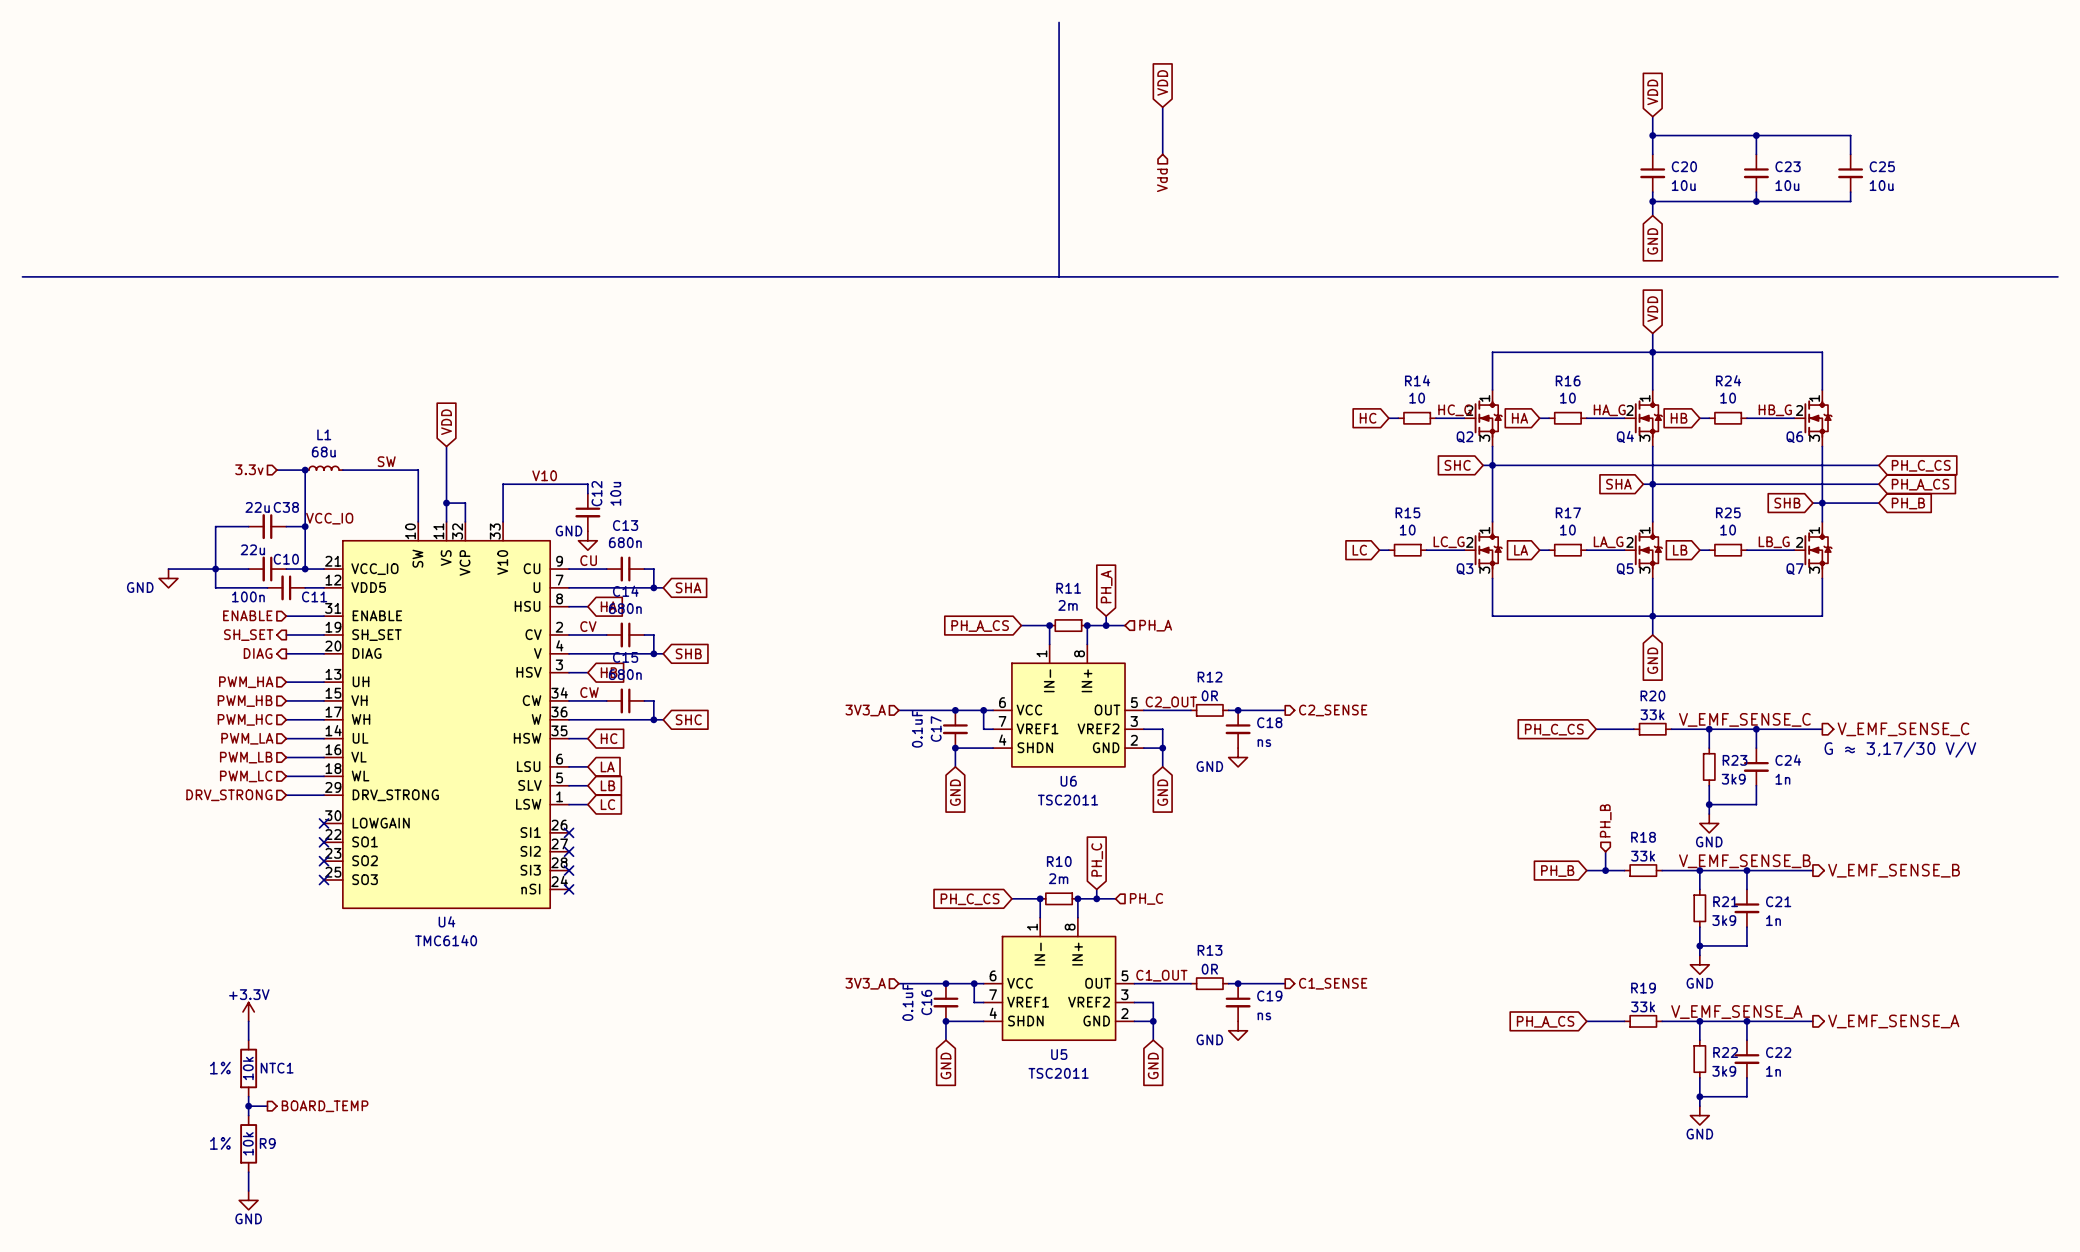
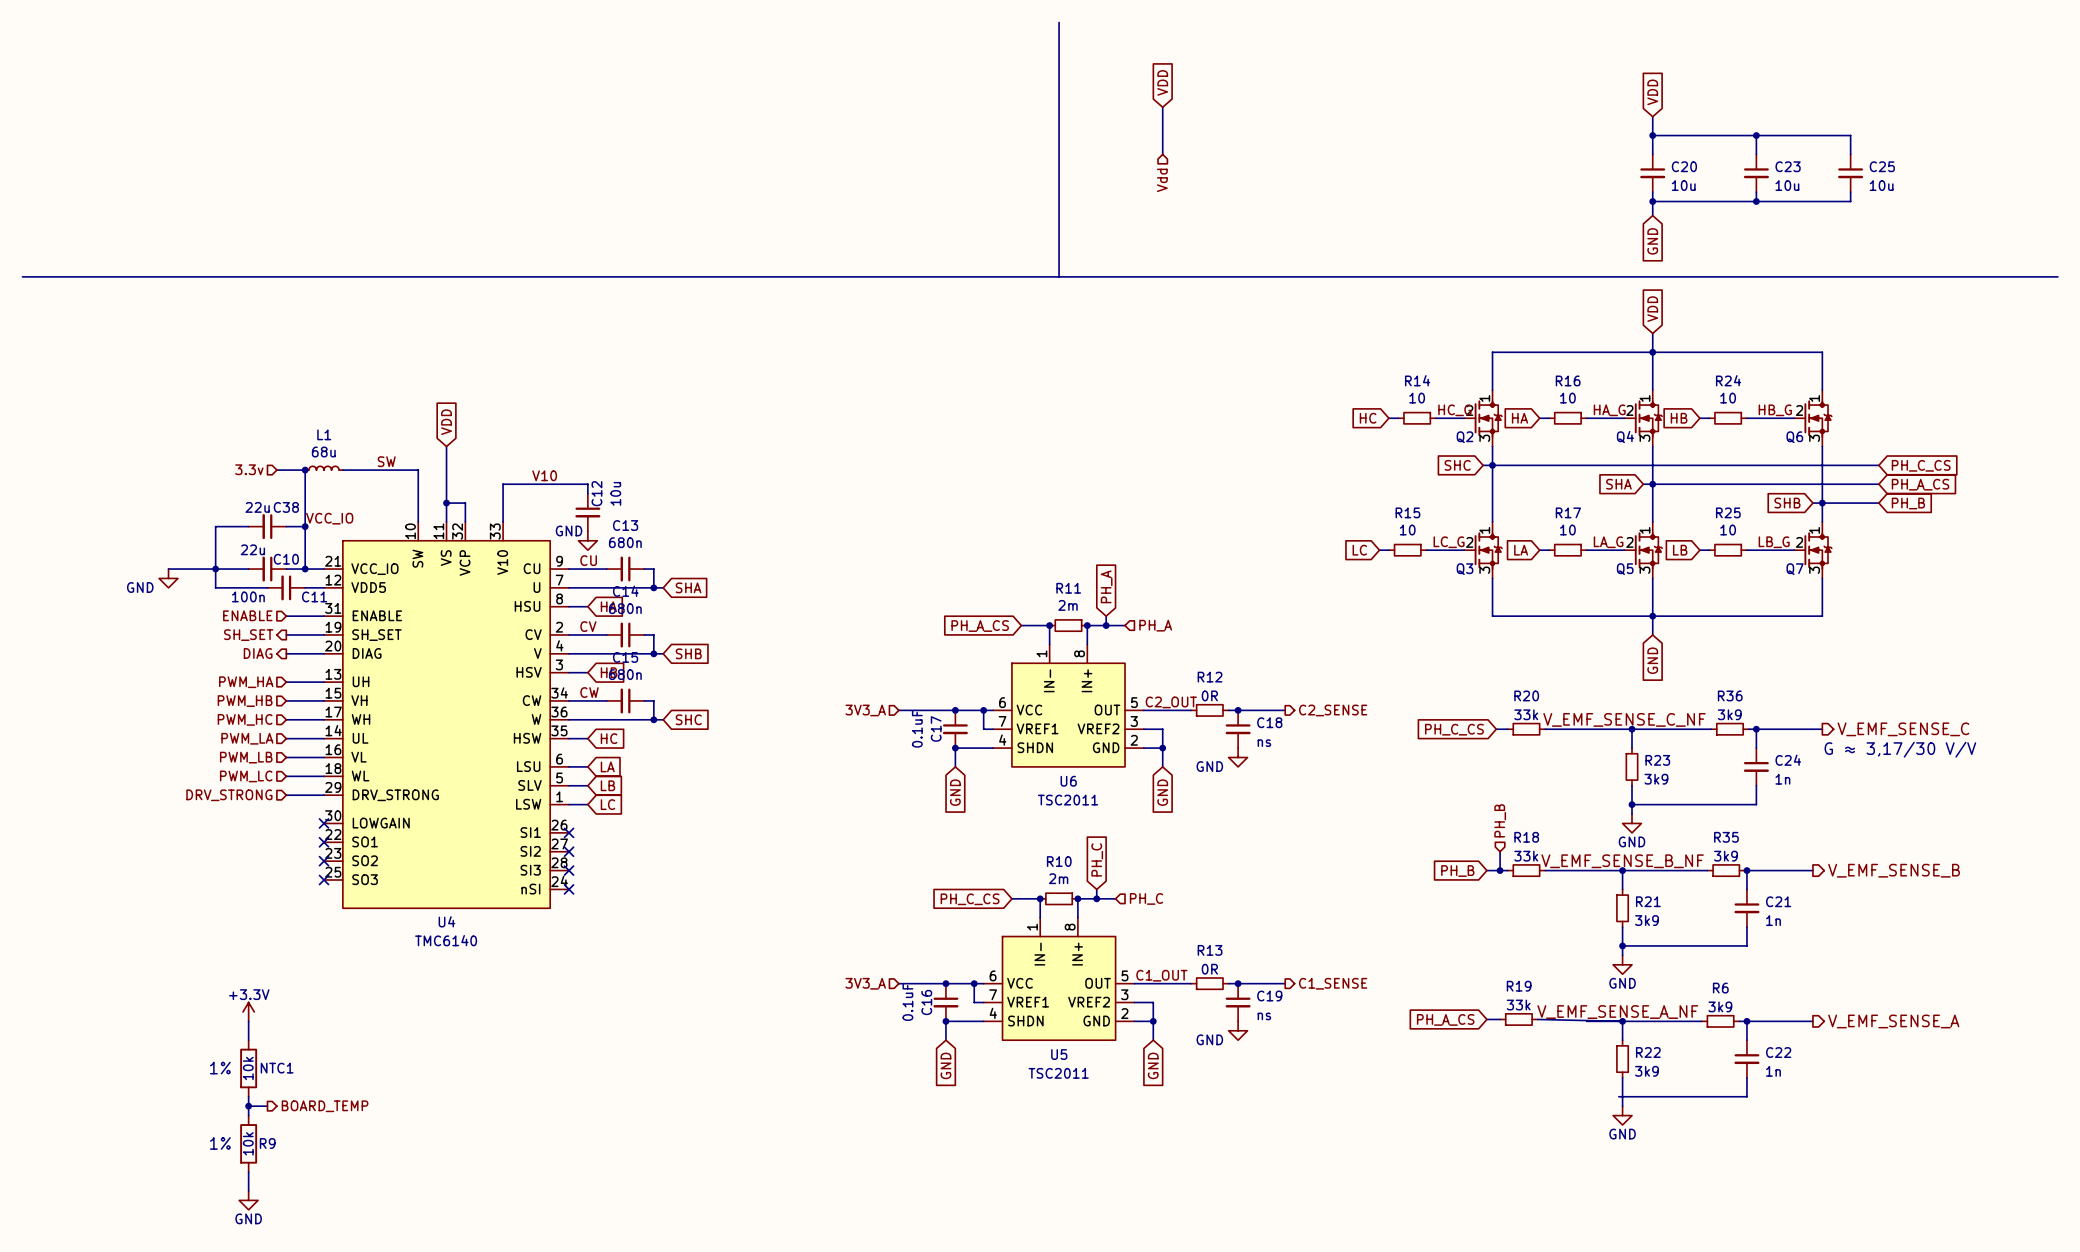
label: V_EMF_SENSE_C (1744, 719) -> V_EMF_SENSE_C_NF (1624, 719)
wire: none -> (1496, 729) (1507, 729)
wire: none -> (1545, 729) (1596, 729)
global label position: PH_C_CS (1554, 729) -> PH_C_CS (1454, 729)
junction: none -> (1632, 729)
R20 position: (1652, 729) -> (1526, 729)
wire: (1709, 729) (1709, 748) -> (1632, 729) (1632, 748)
junction: (1709, 729) -> none
wire: (1711, 729) (1748, 729) -> (1633, 729) (1671, 729)
R36: none -> 3k9 (1730, 729)
R23 position: (1709, 766) -> (1632, 766)
wire: (1709, 785) (1709, 814) -> (1632, 785) (1632, 814)
wire: none -> (1632, 804) (1709, 804)
junction: none -> (1632, 804)
junction: (1709, 804) -> none
hierarchical label position: PH_B (1605, 820) -> PH_B (1500, 820)
power symbol position: GND (1709, 823) -> GND (1632, 823)
wire: (1605, 851) (1605, 870) -> (1500, 851) (1500, 870)
label: V_EMF_SENSE_B (1744, 861) -> V_EMF_SENSE_B_NF (1622, 861)
wire: none -> (1486, 870) (1507, 870)
junction: none -> (1500, 870)
wire: none -> (1545, 870) (1586, 870)
junction position: (1605, 870) -> (1622, 870)
R18 position: (1643, 870) -> (1526, 870)
wire: (1699, 870) (1699, 889) -> (1622, 870) (1622, 889)
junction: (1699, 870) -> none
wire: (1707, 870) (1745, 870) -> (1624, 870) (1662, 870)
R35: none -> 3k9 (1726, 870)
global label position: PH_B (1557, 871) -> PH_B (1457, 871)
R21 position: (1699, 908) -> (1622, 908)
wire: (1699, 927) (1699, 955) -> (1622, 927) (1622, 955)
wire: none -> (1622, 945) (1699, 945)
junction: none -> (1622, 945)
junction: (1699, 945) -> none
power symbol position: GND (1699, 964) -> GND (1622, 964)
label: V_EMF_SENSE_A (1736, 1012) -> V_EMF_SENSE_A_NF (1617, 1012)
wire: none -> (1486, 1019) (1500, 1019)
wire: none -> (1537, 1019) (1622, 1021) (1622, 1040)
global label position: PH_A_CS (1545, 1021) -> PH_A_CS (1445, 1019)
junction: none -> (1622, 1021)
R19 position: (1643, 1021) -> (1518, 1019)
wire: (1699, 1021) (1699, 1040) -> none
junction: (1699, 1021) -> none
wire: (1701, 1021) (1739, 1021) -> (1624, 1021) (1662, 1021)
R6: none -> 3k9 (1720, 1021)
R22 position: (1699, 1059) -> (1622, 1059)
wire: (1699, 1077) (1699, 1106) -> (1622, 1077) (1622, 1106)
wire: none -> (1618, 1096) (1699, 1096)
junction: (1699, 1096) -> none
power symbol position: GND (1699, 1115) -> GND (1622, 1115)

